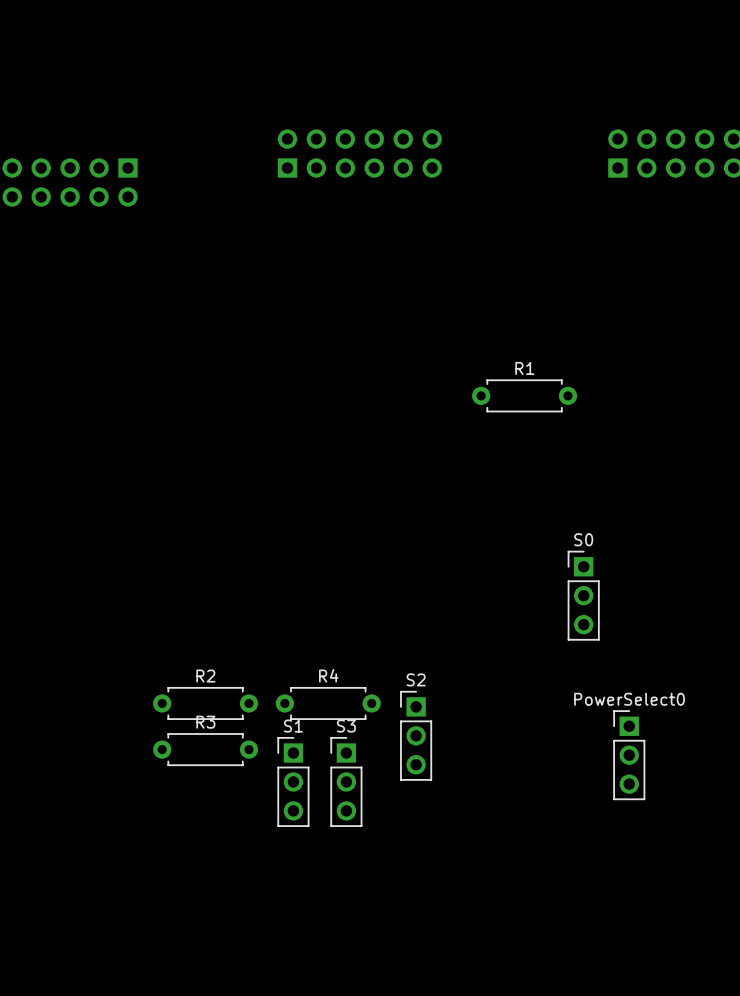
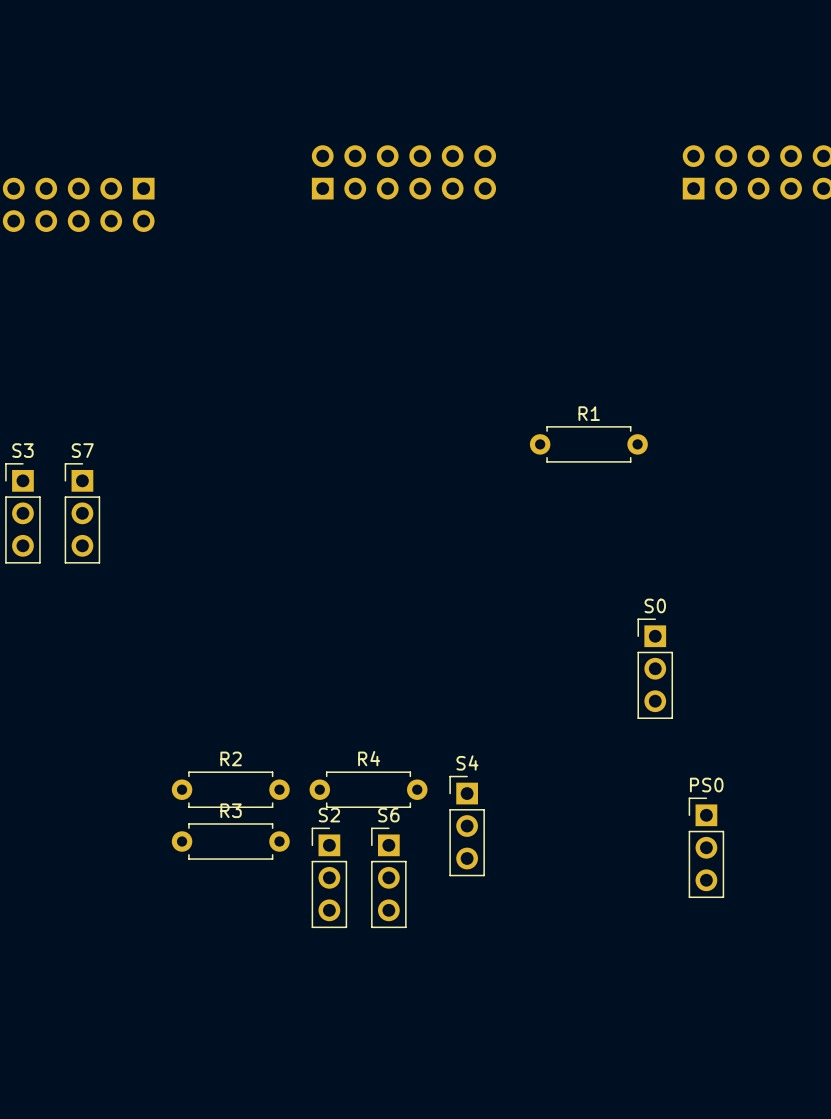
S3: none -> (22, 513)
S7: none -> (82, 513)
S2 name: S2 (416, 679) -> S4 (467, 762)
PowerSelect0 name: PowerSelect0 (629, 699) -> PS0 (706, 785)
S1 name: S1 (293, 726) -> S2 (329, 815)
S3 name: S3 (346, 726) -> S6 (388, 815)

